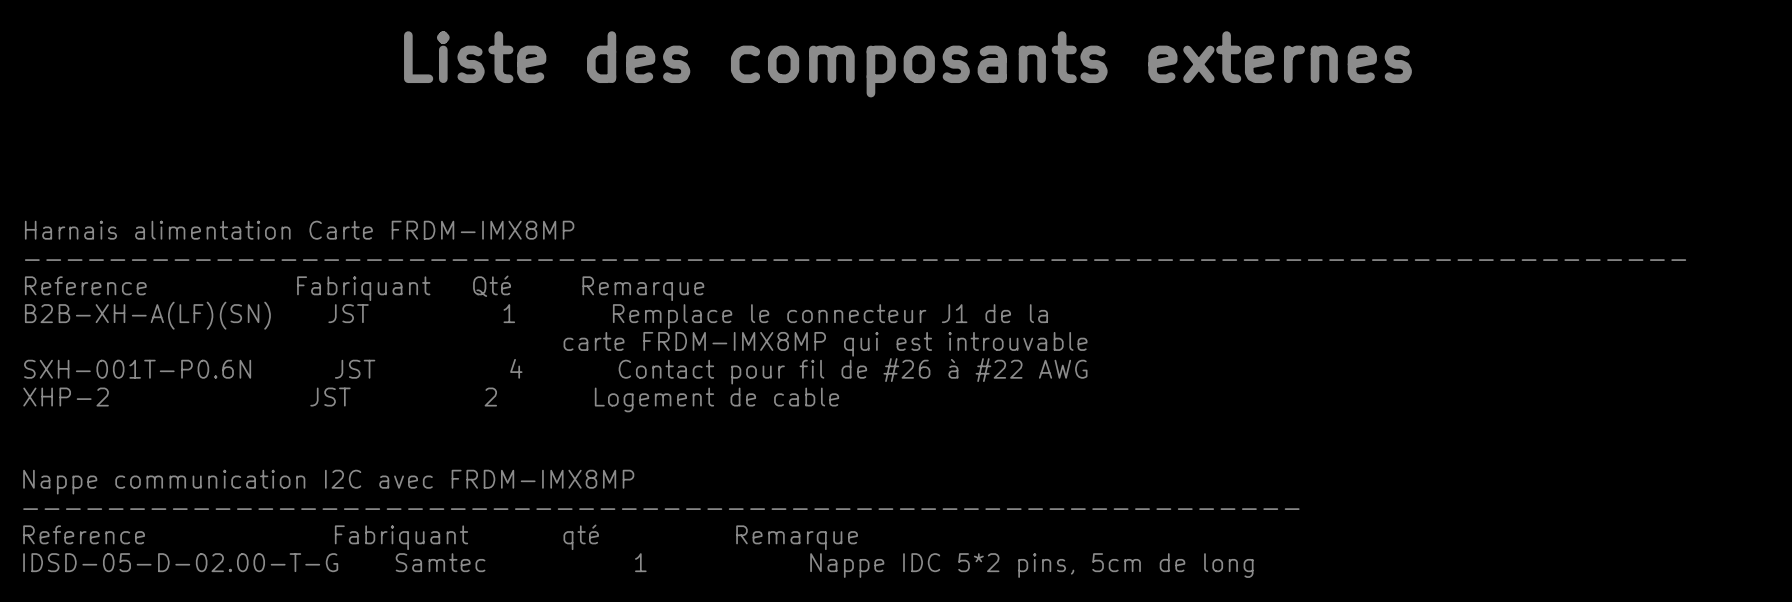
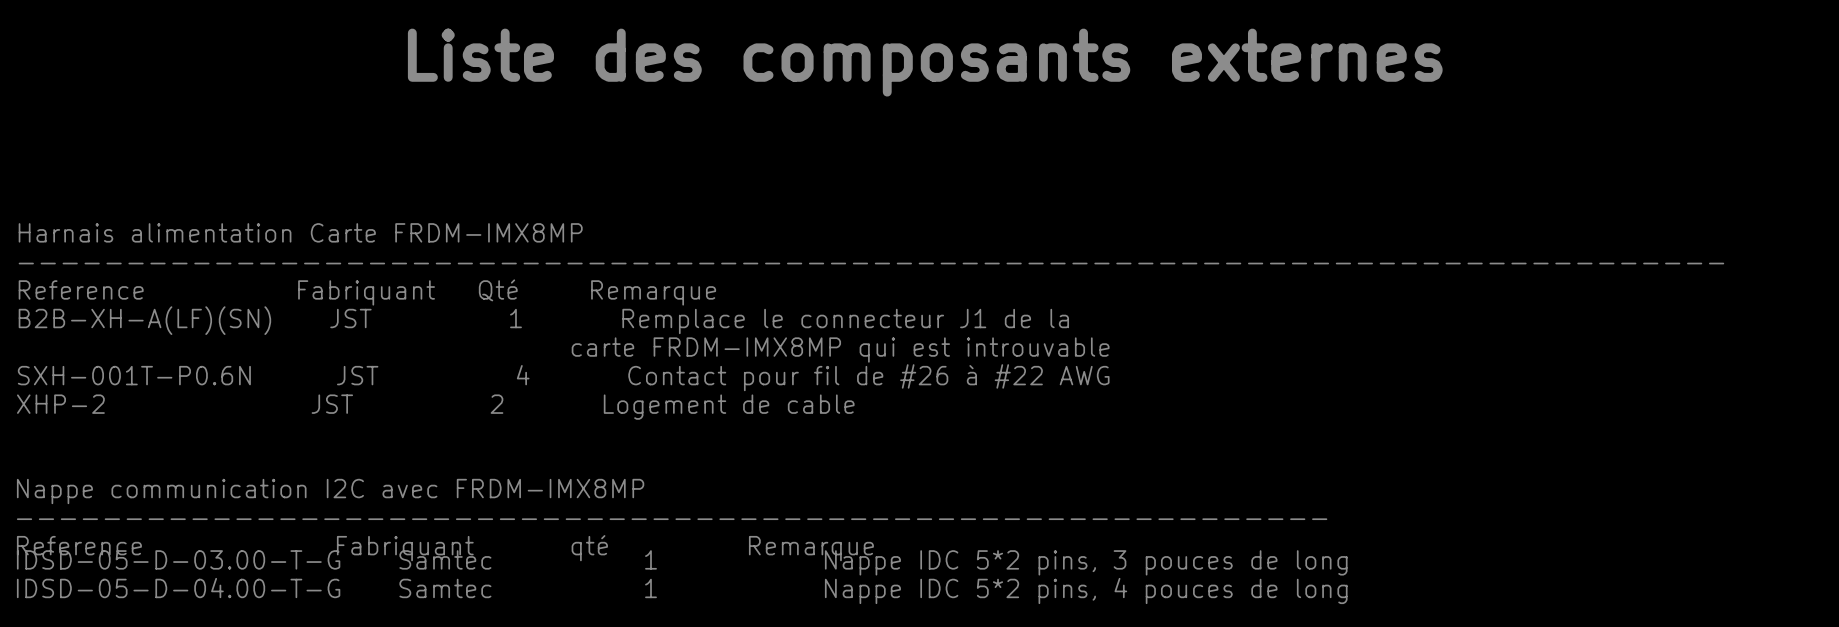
text: none -> IDSD-05-D-03.00-T-G Samtec 1 Nappe IDC 5*2 pins, 3 pouces de long (682, 562)
text: IDSD-05-D-02.00-T-G Samtec 1 Nappe IDC 5*2 pins, 5cm de long (638, 565) -> none
text: none -> IDSD-05-D-04.00-T-G Samtec 1 Nappe IDC 5*2 pins, 4 pouces de long (682, 590)

